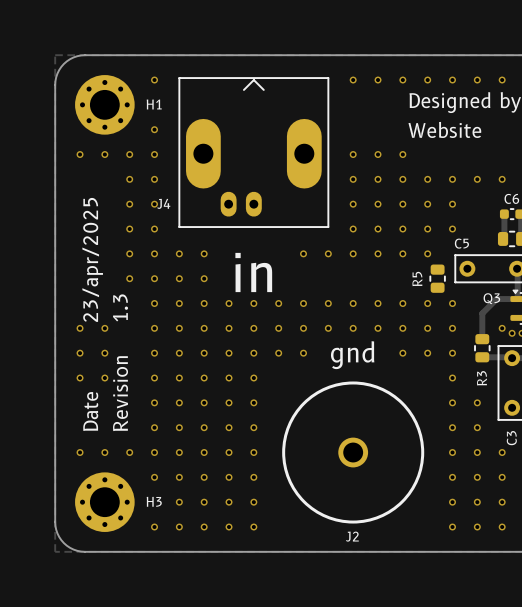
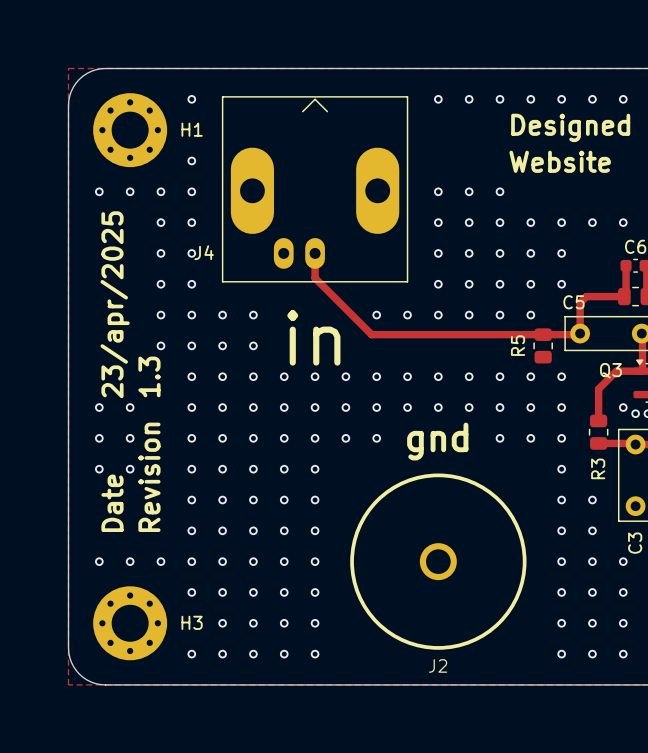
track: none -> (315, 253) (315, 278) (371, 334) (579, 334)
track: none -> (624, 296) (586, 296) (580, 302) (580, 333)

